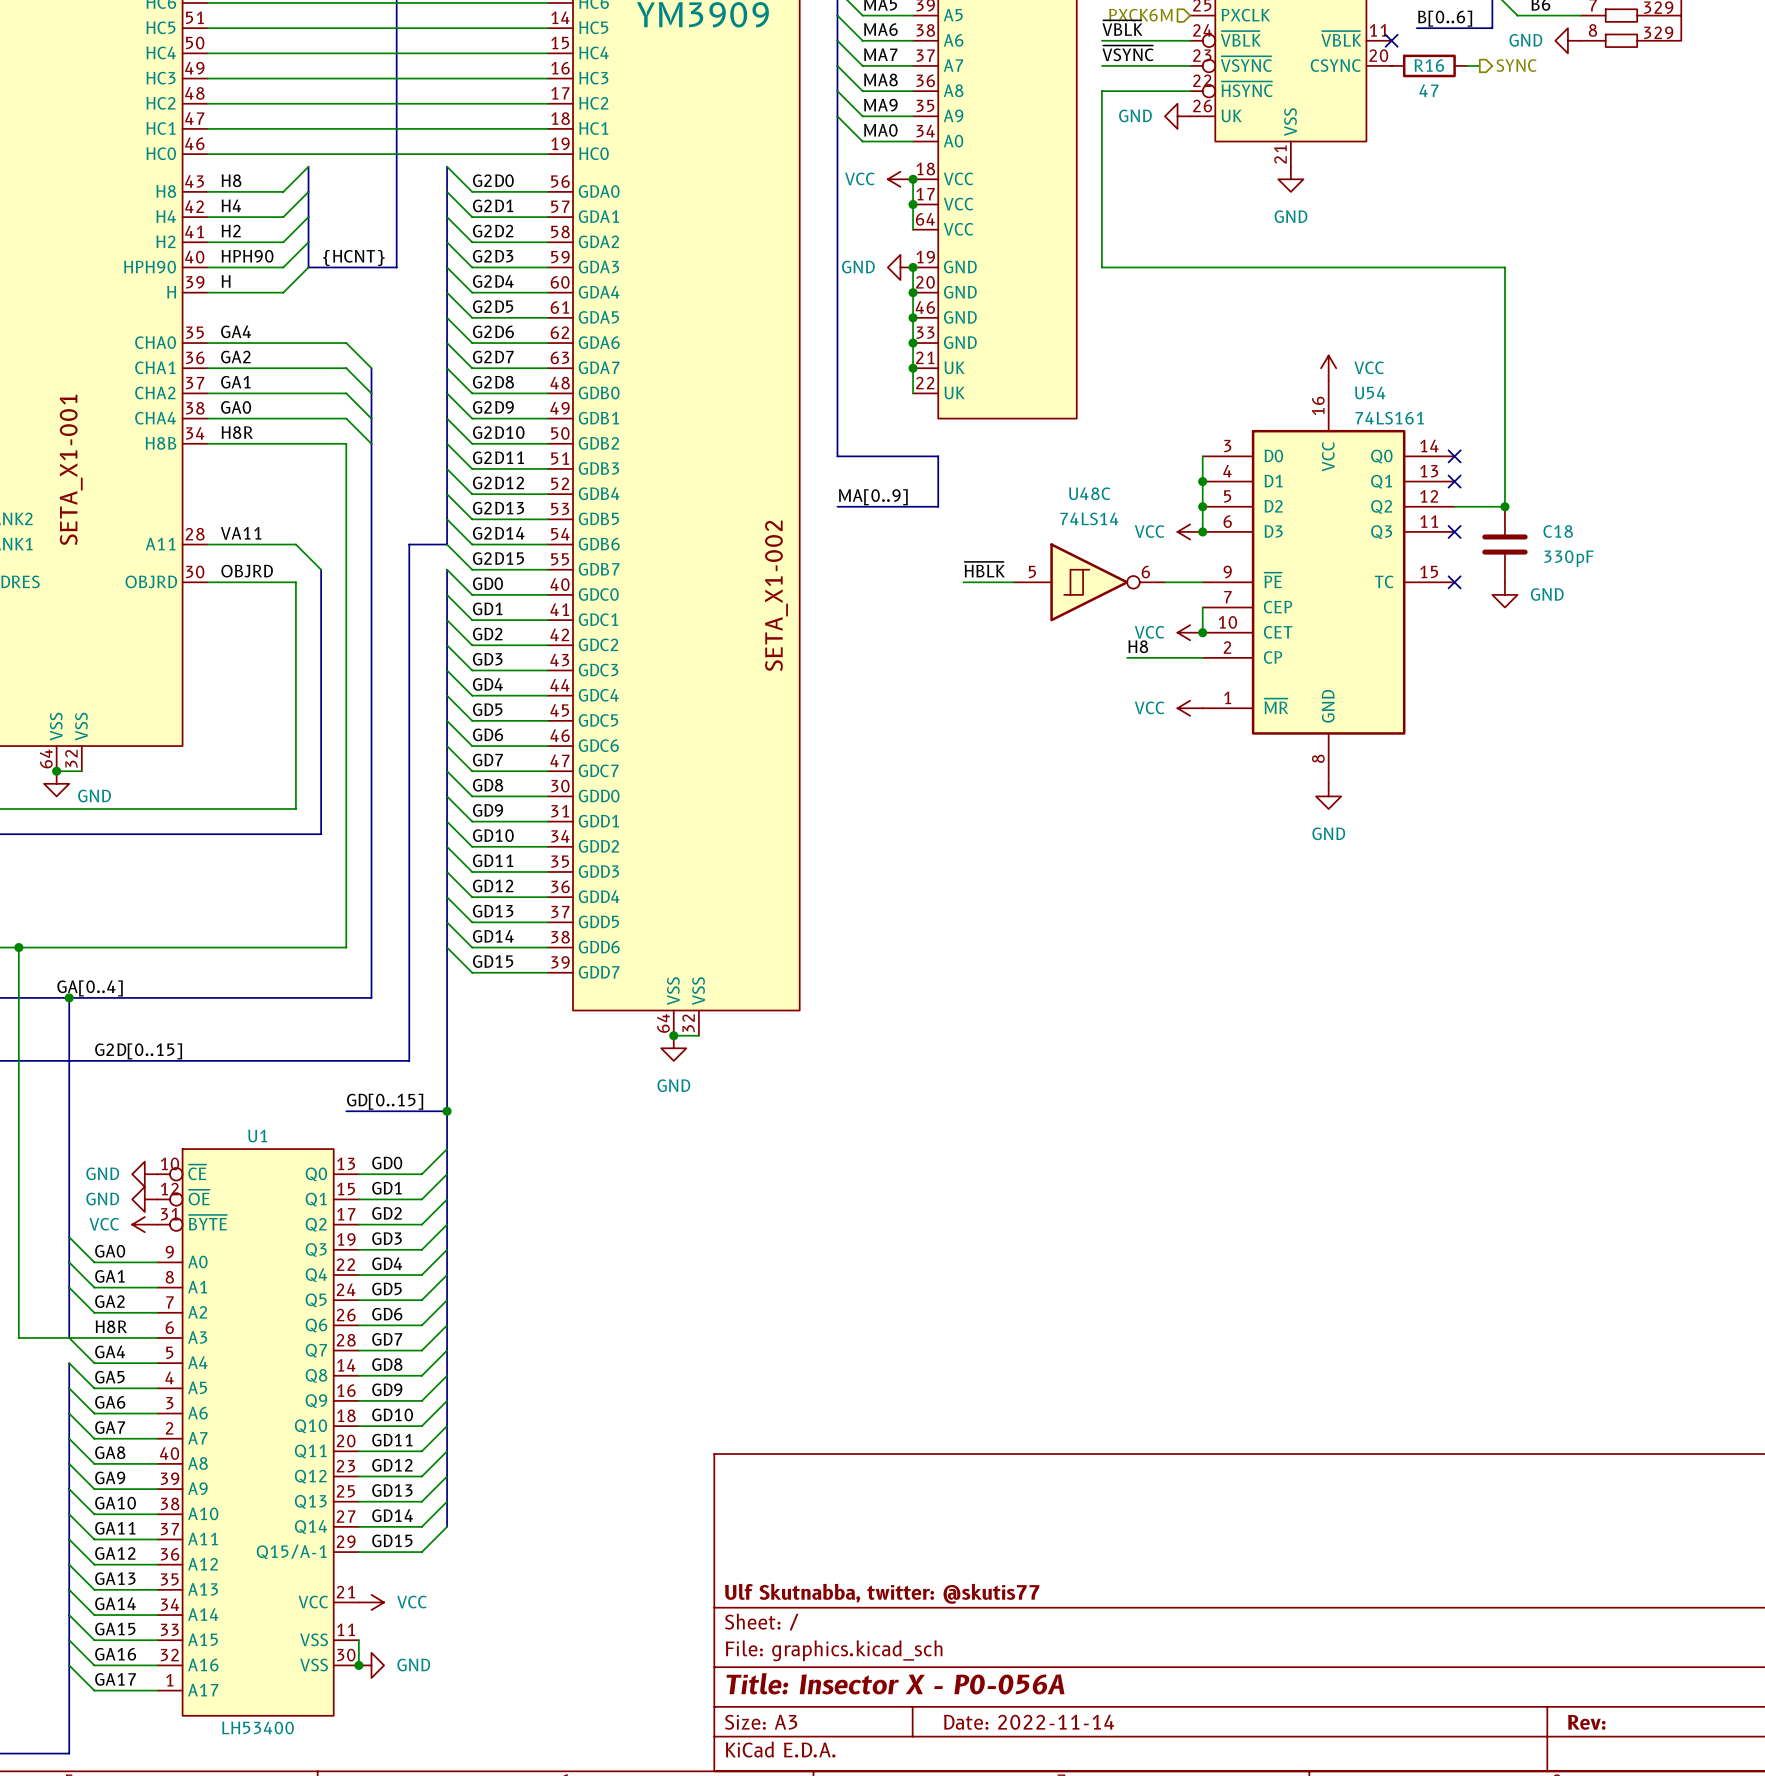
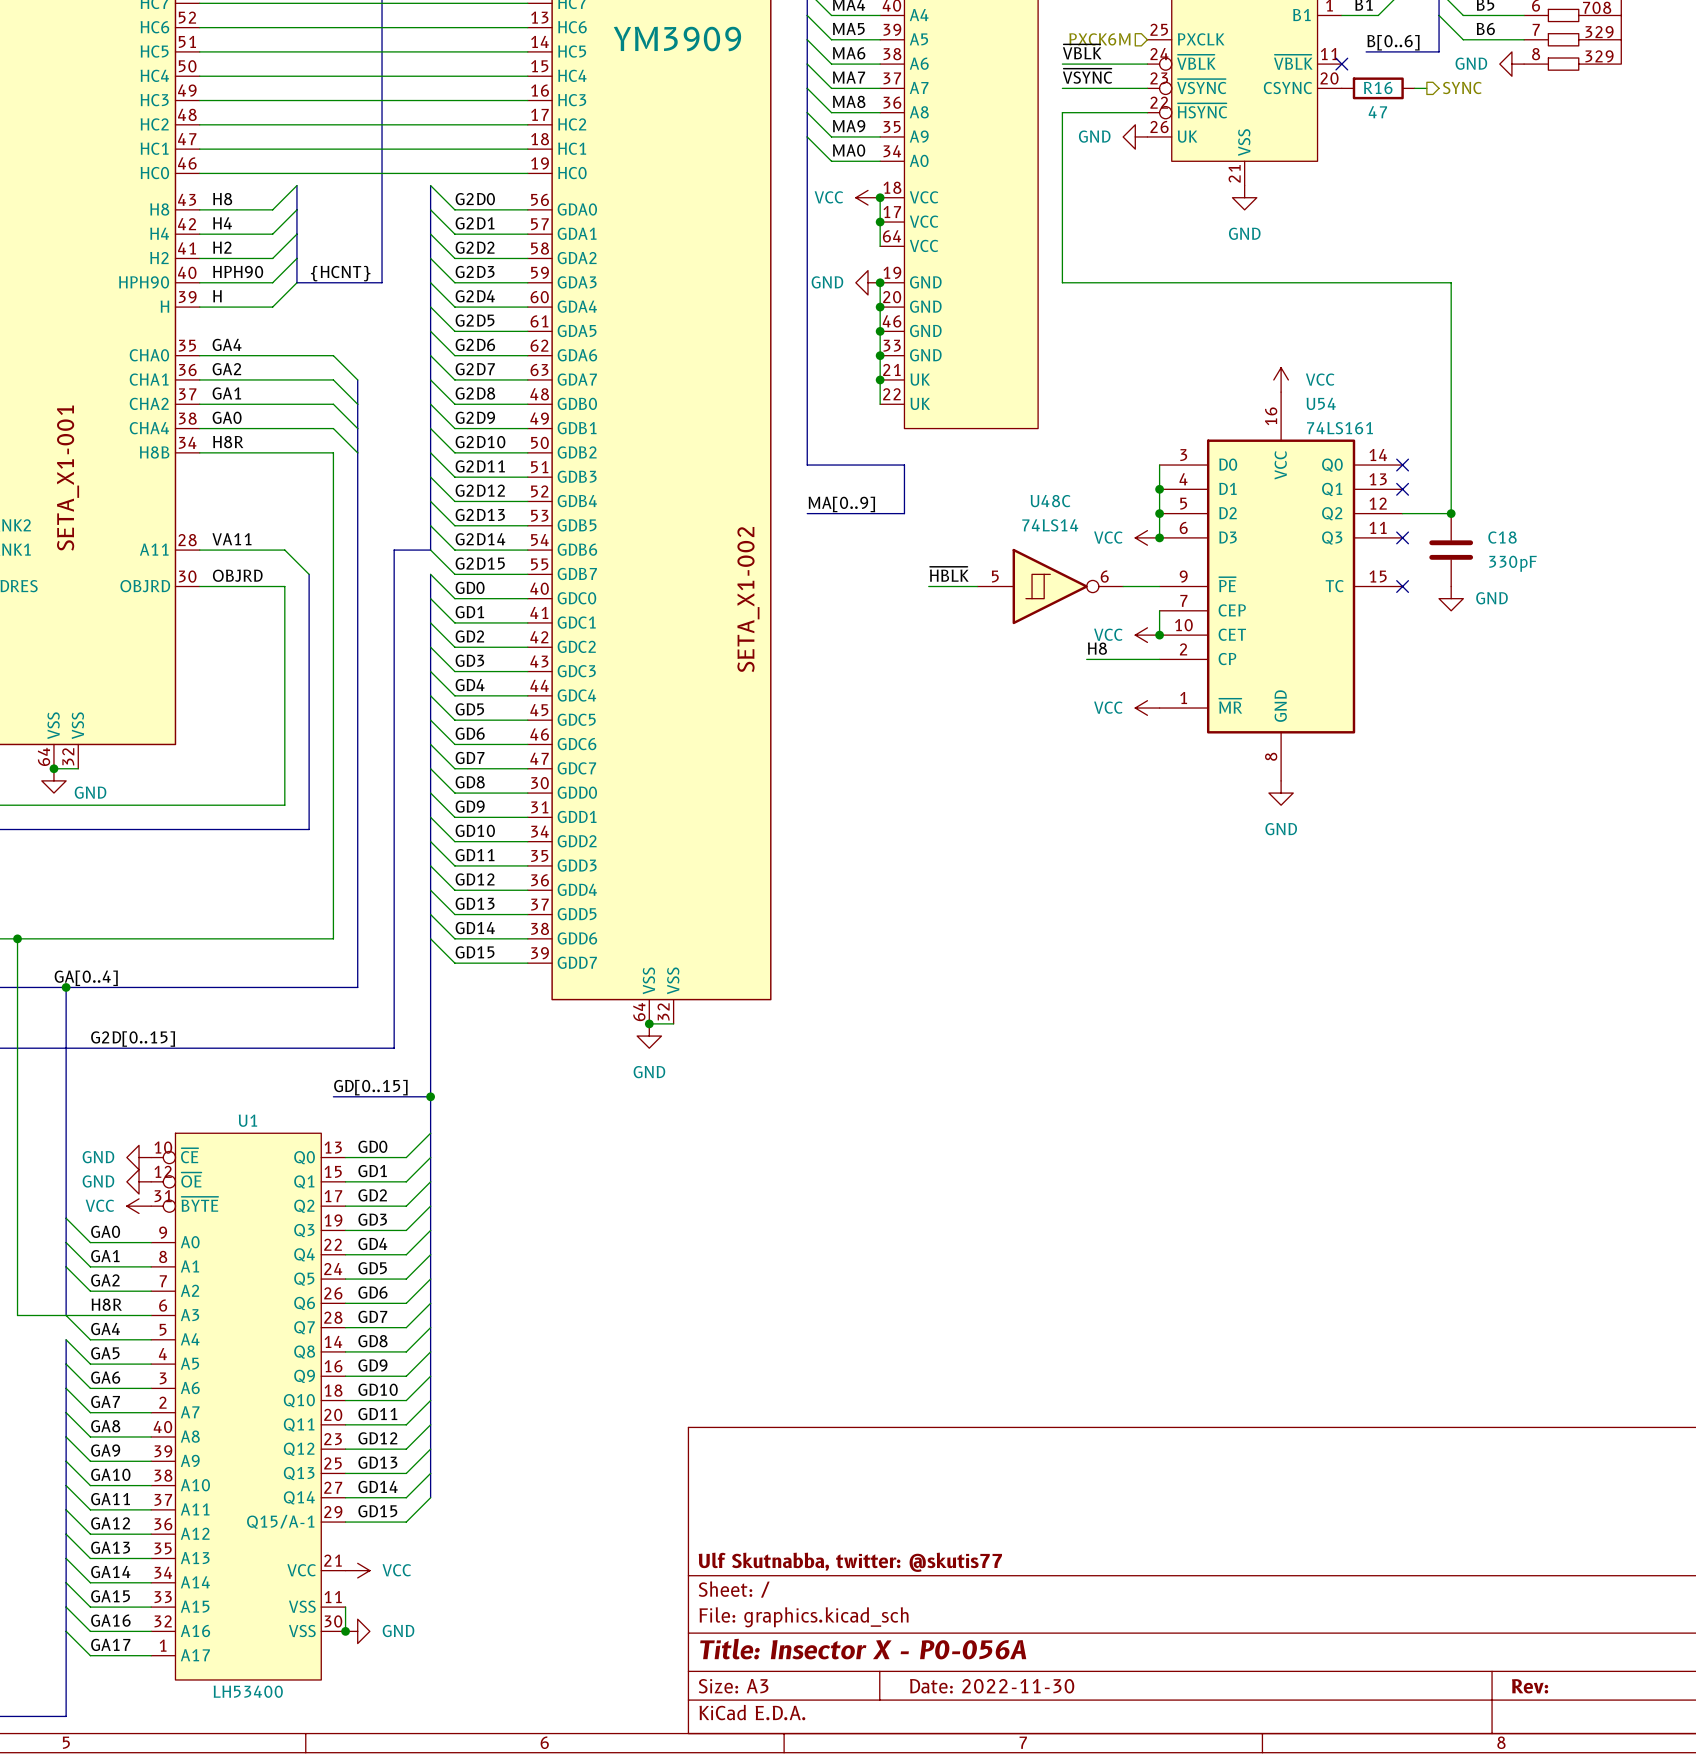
title block: Date: 2022-11-14 (1029, 1722) -> Date: 2022-11-30 (992, 1686)

